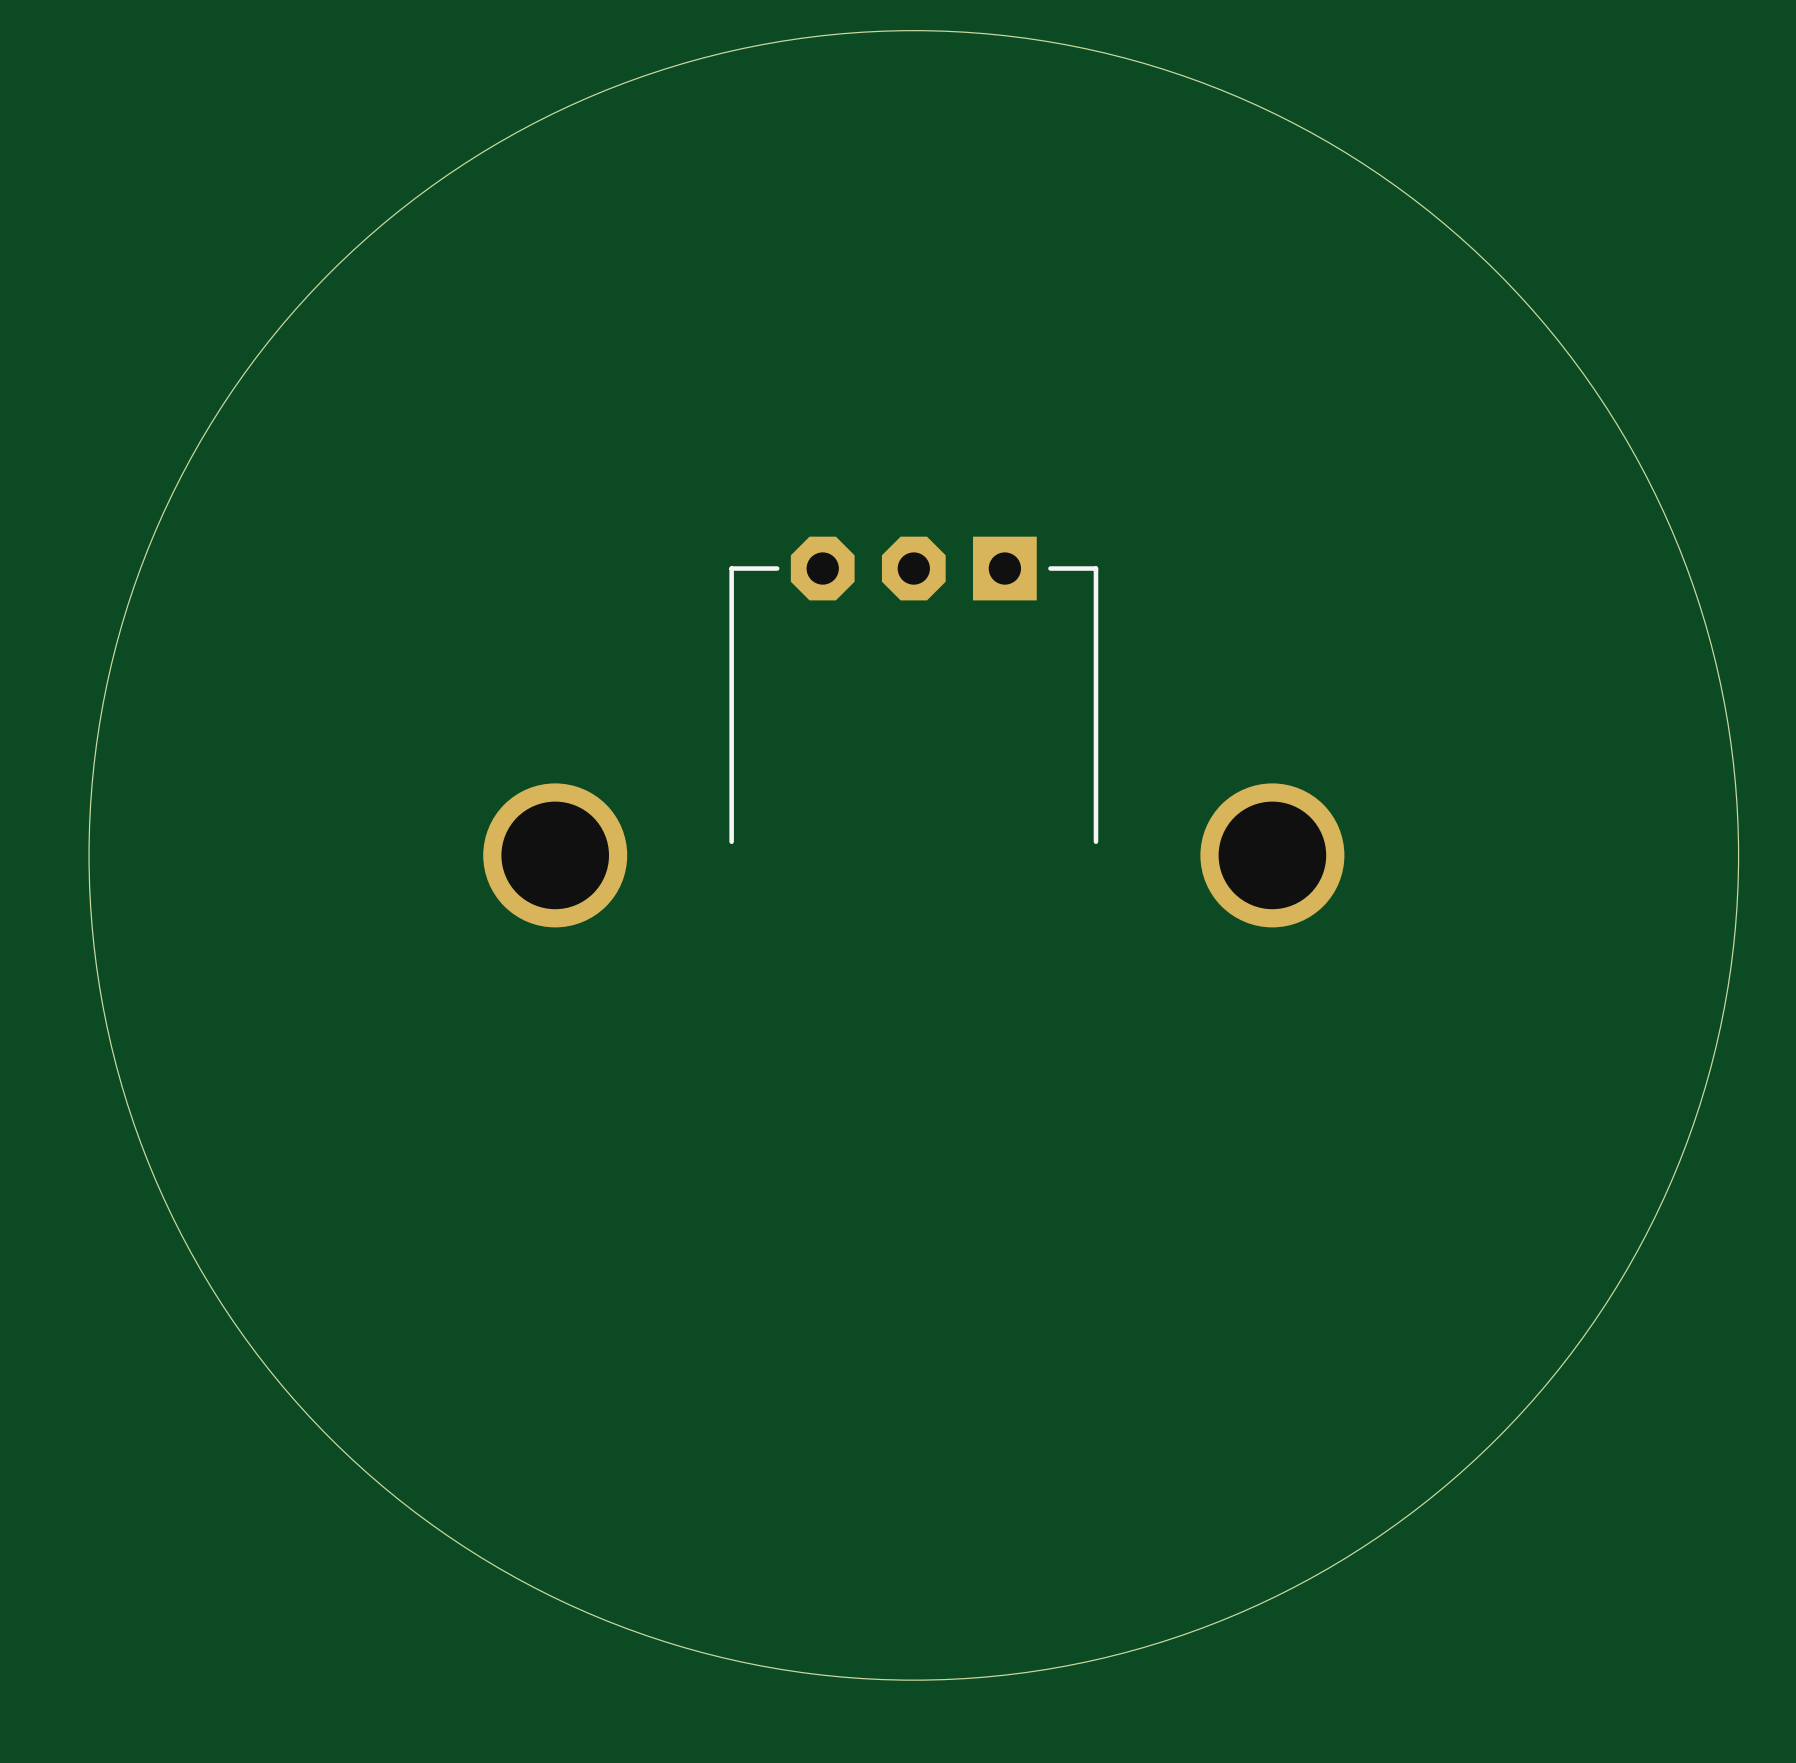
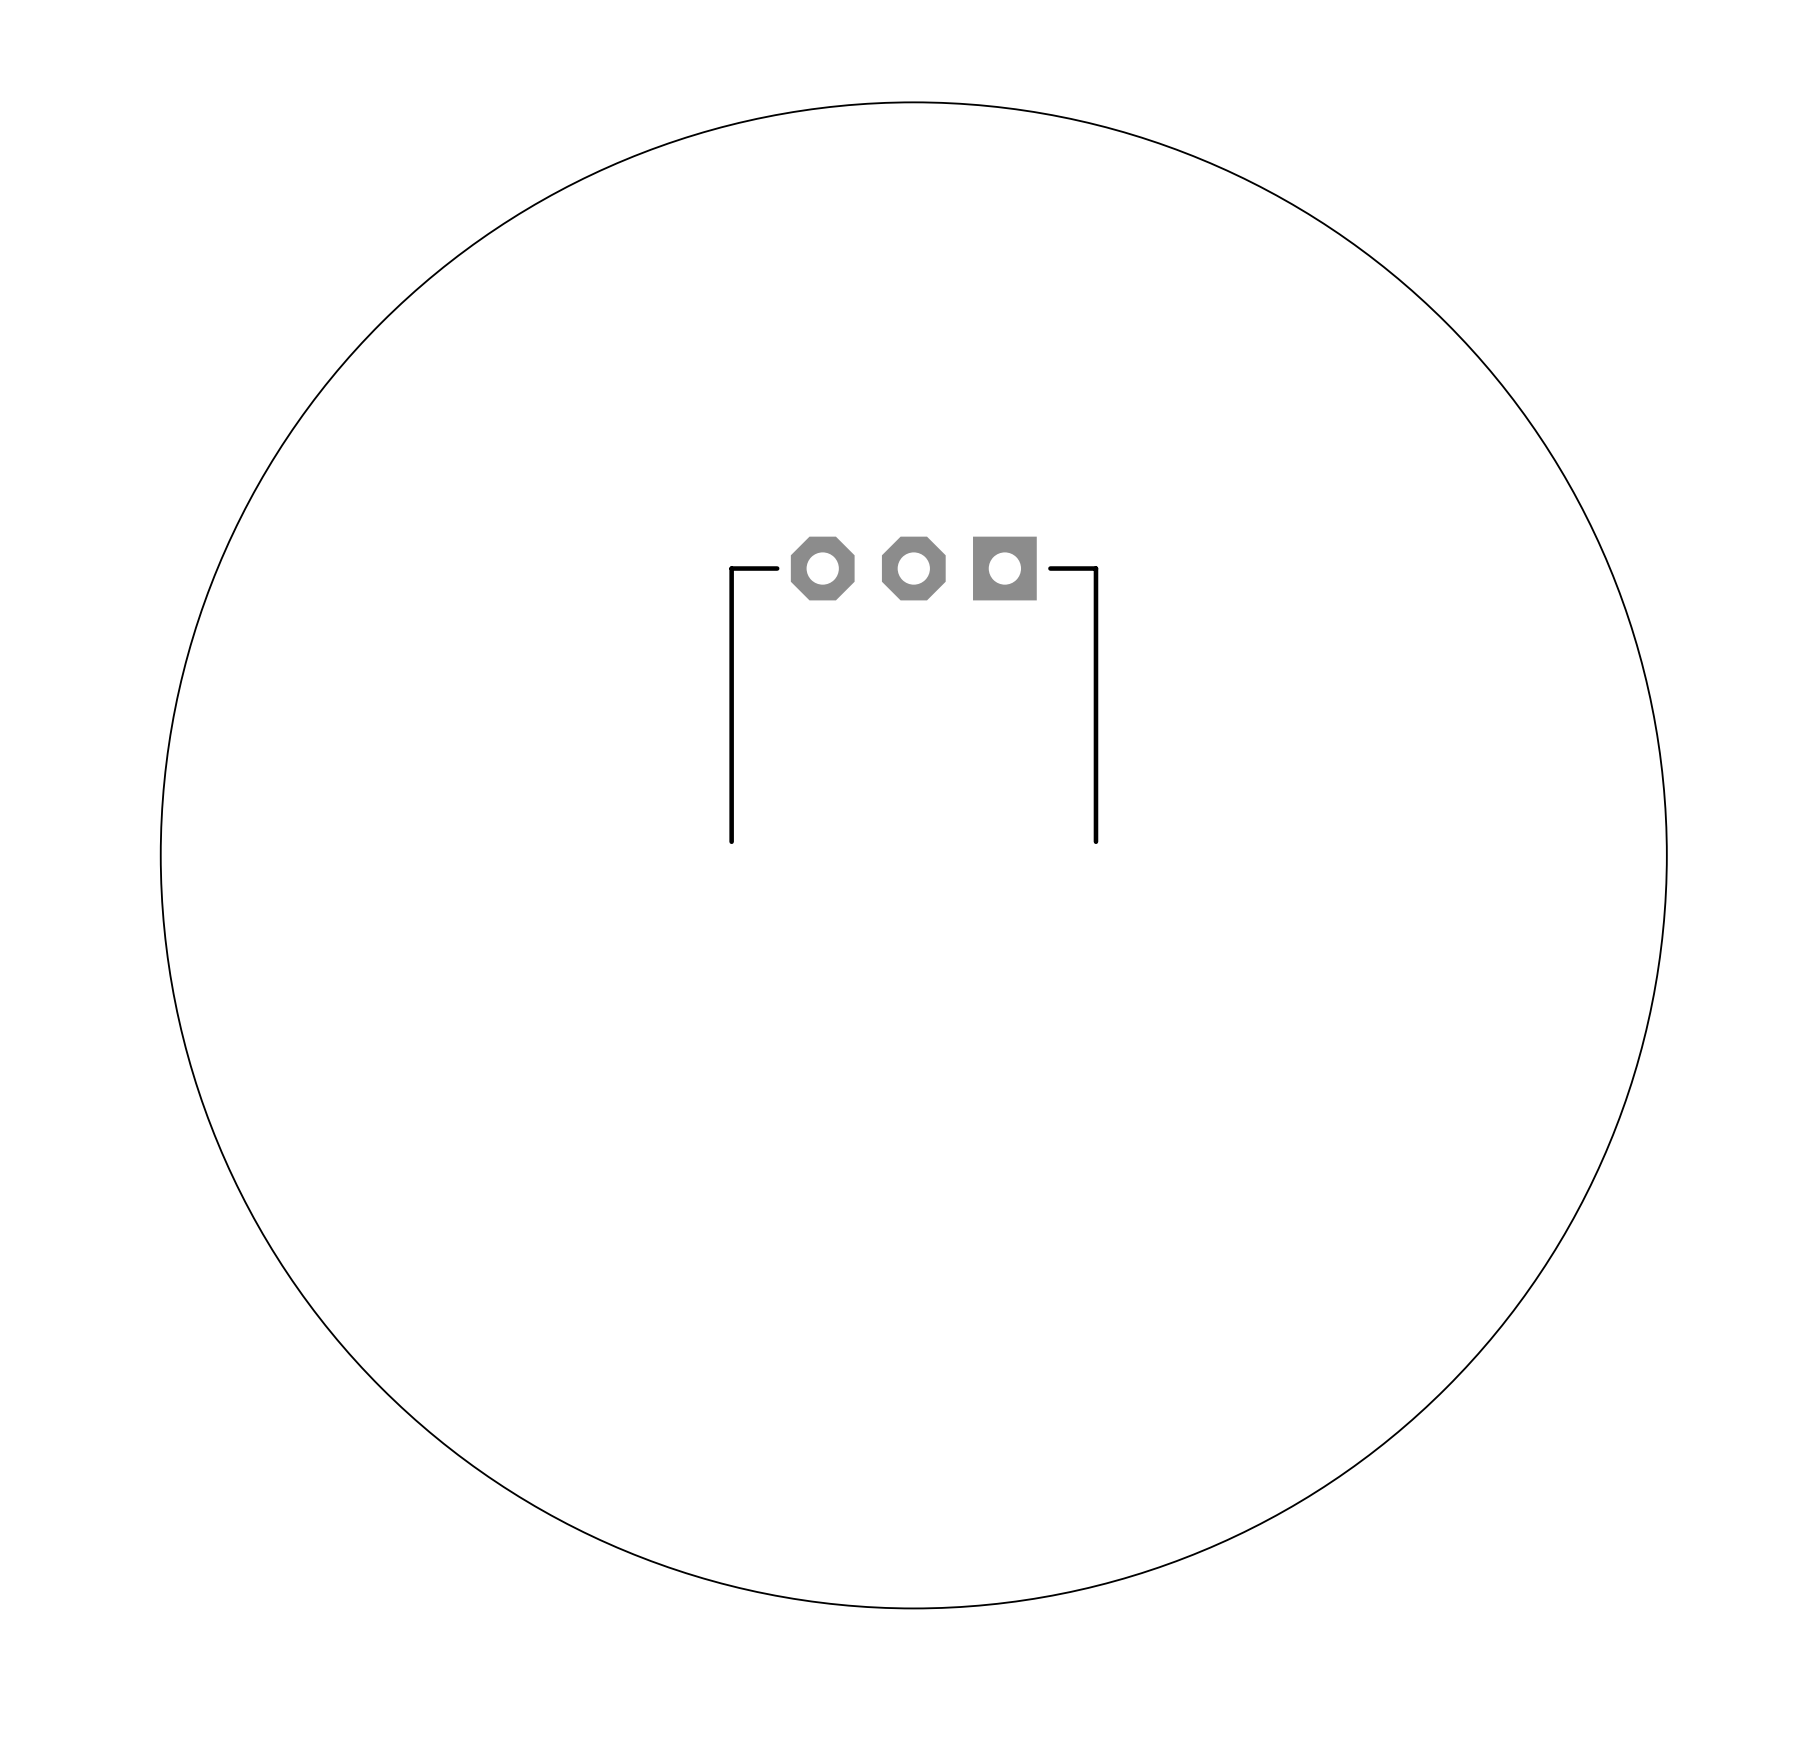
round board edge size: [88, 30, 1739, 1681] -> [160, 102, 1668, 1609]
part: (555, 855) -> none
part: (1272, 855) -> none

